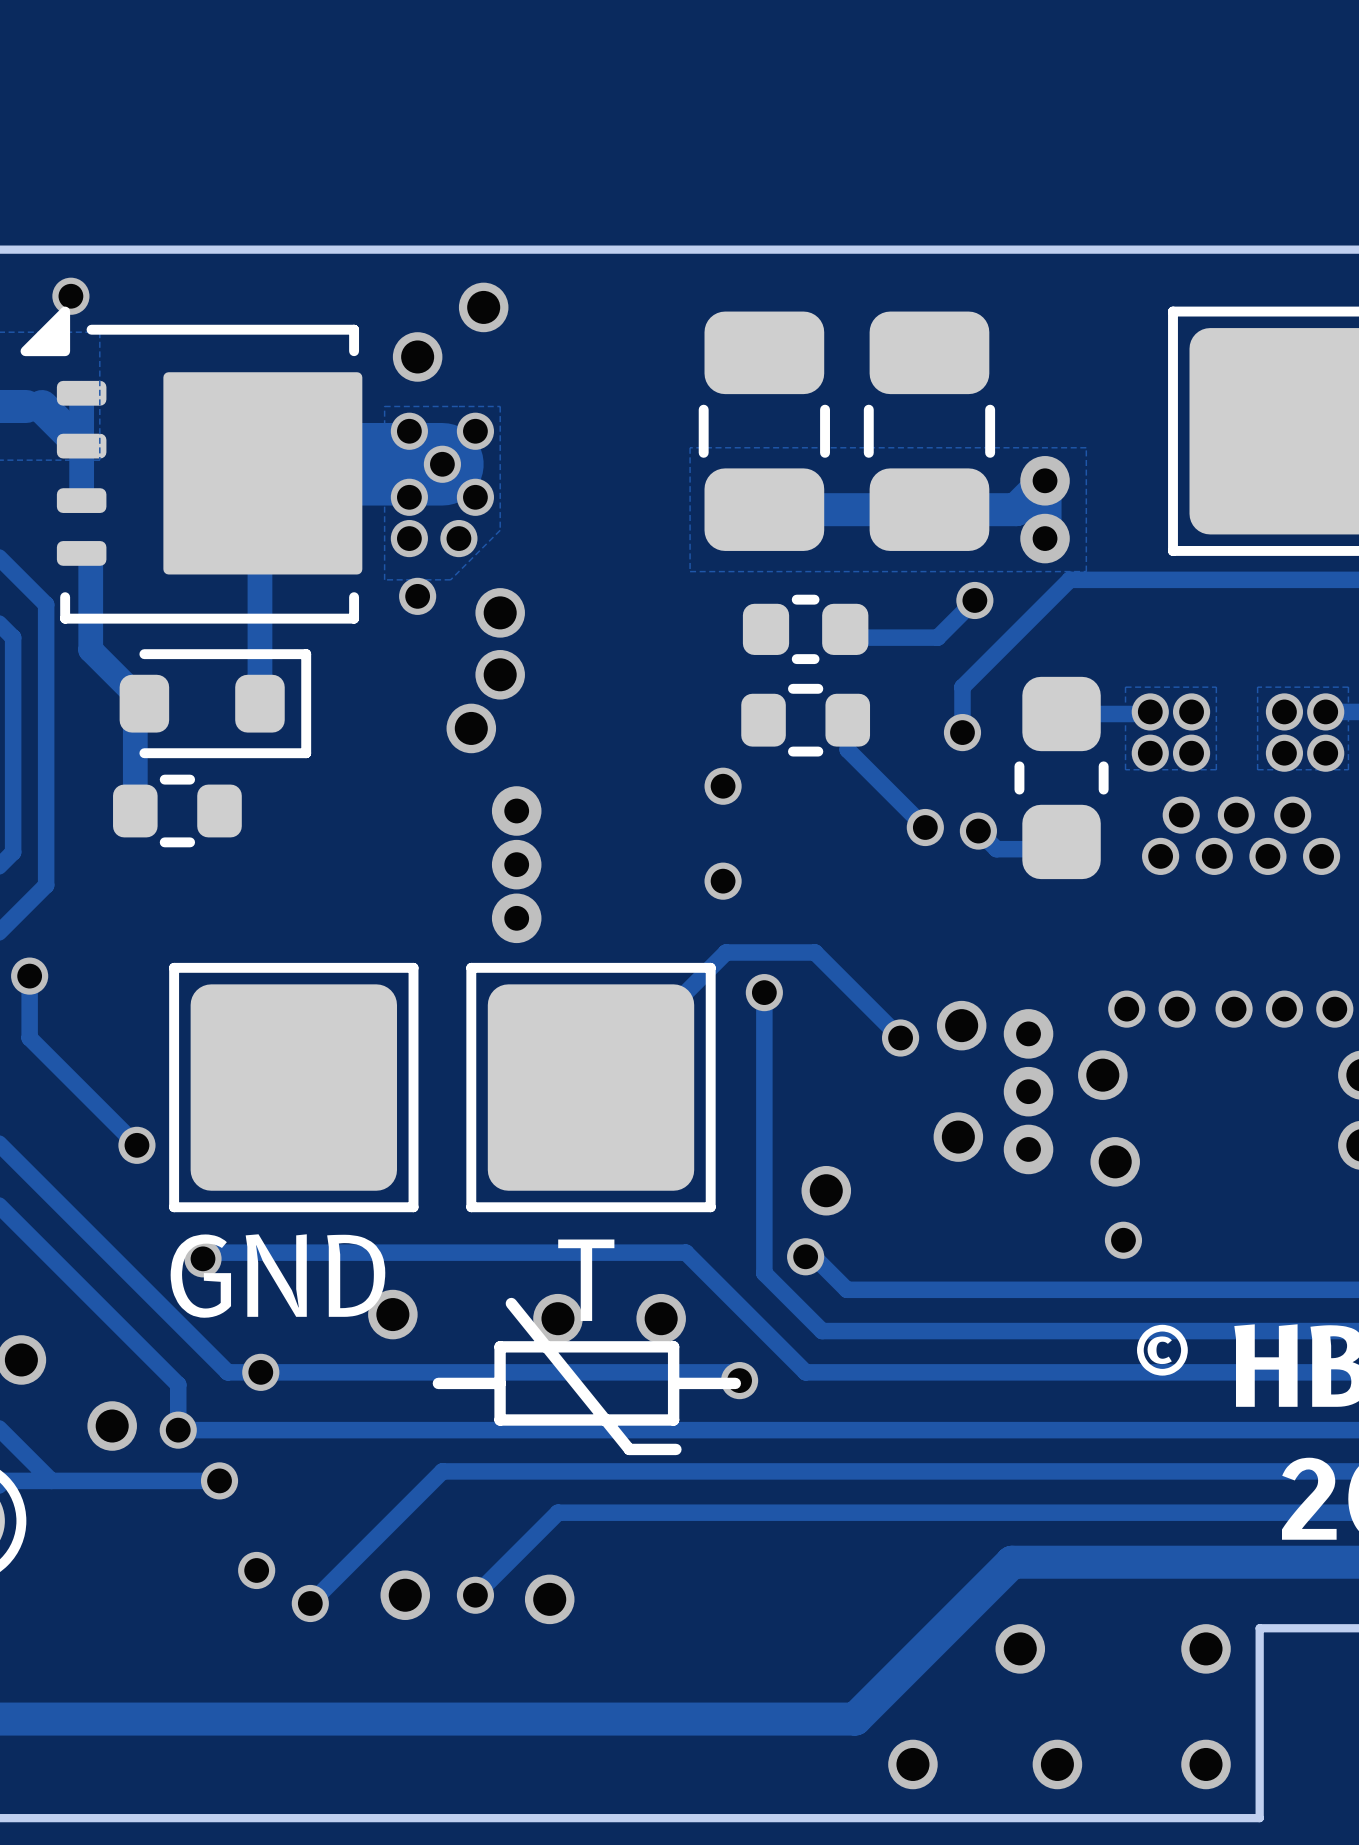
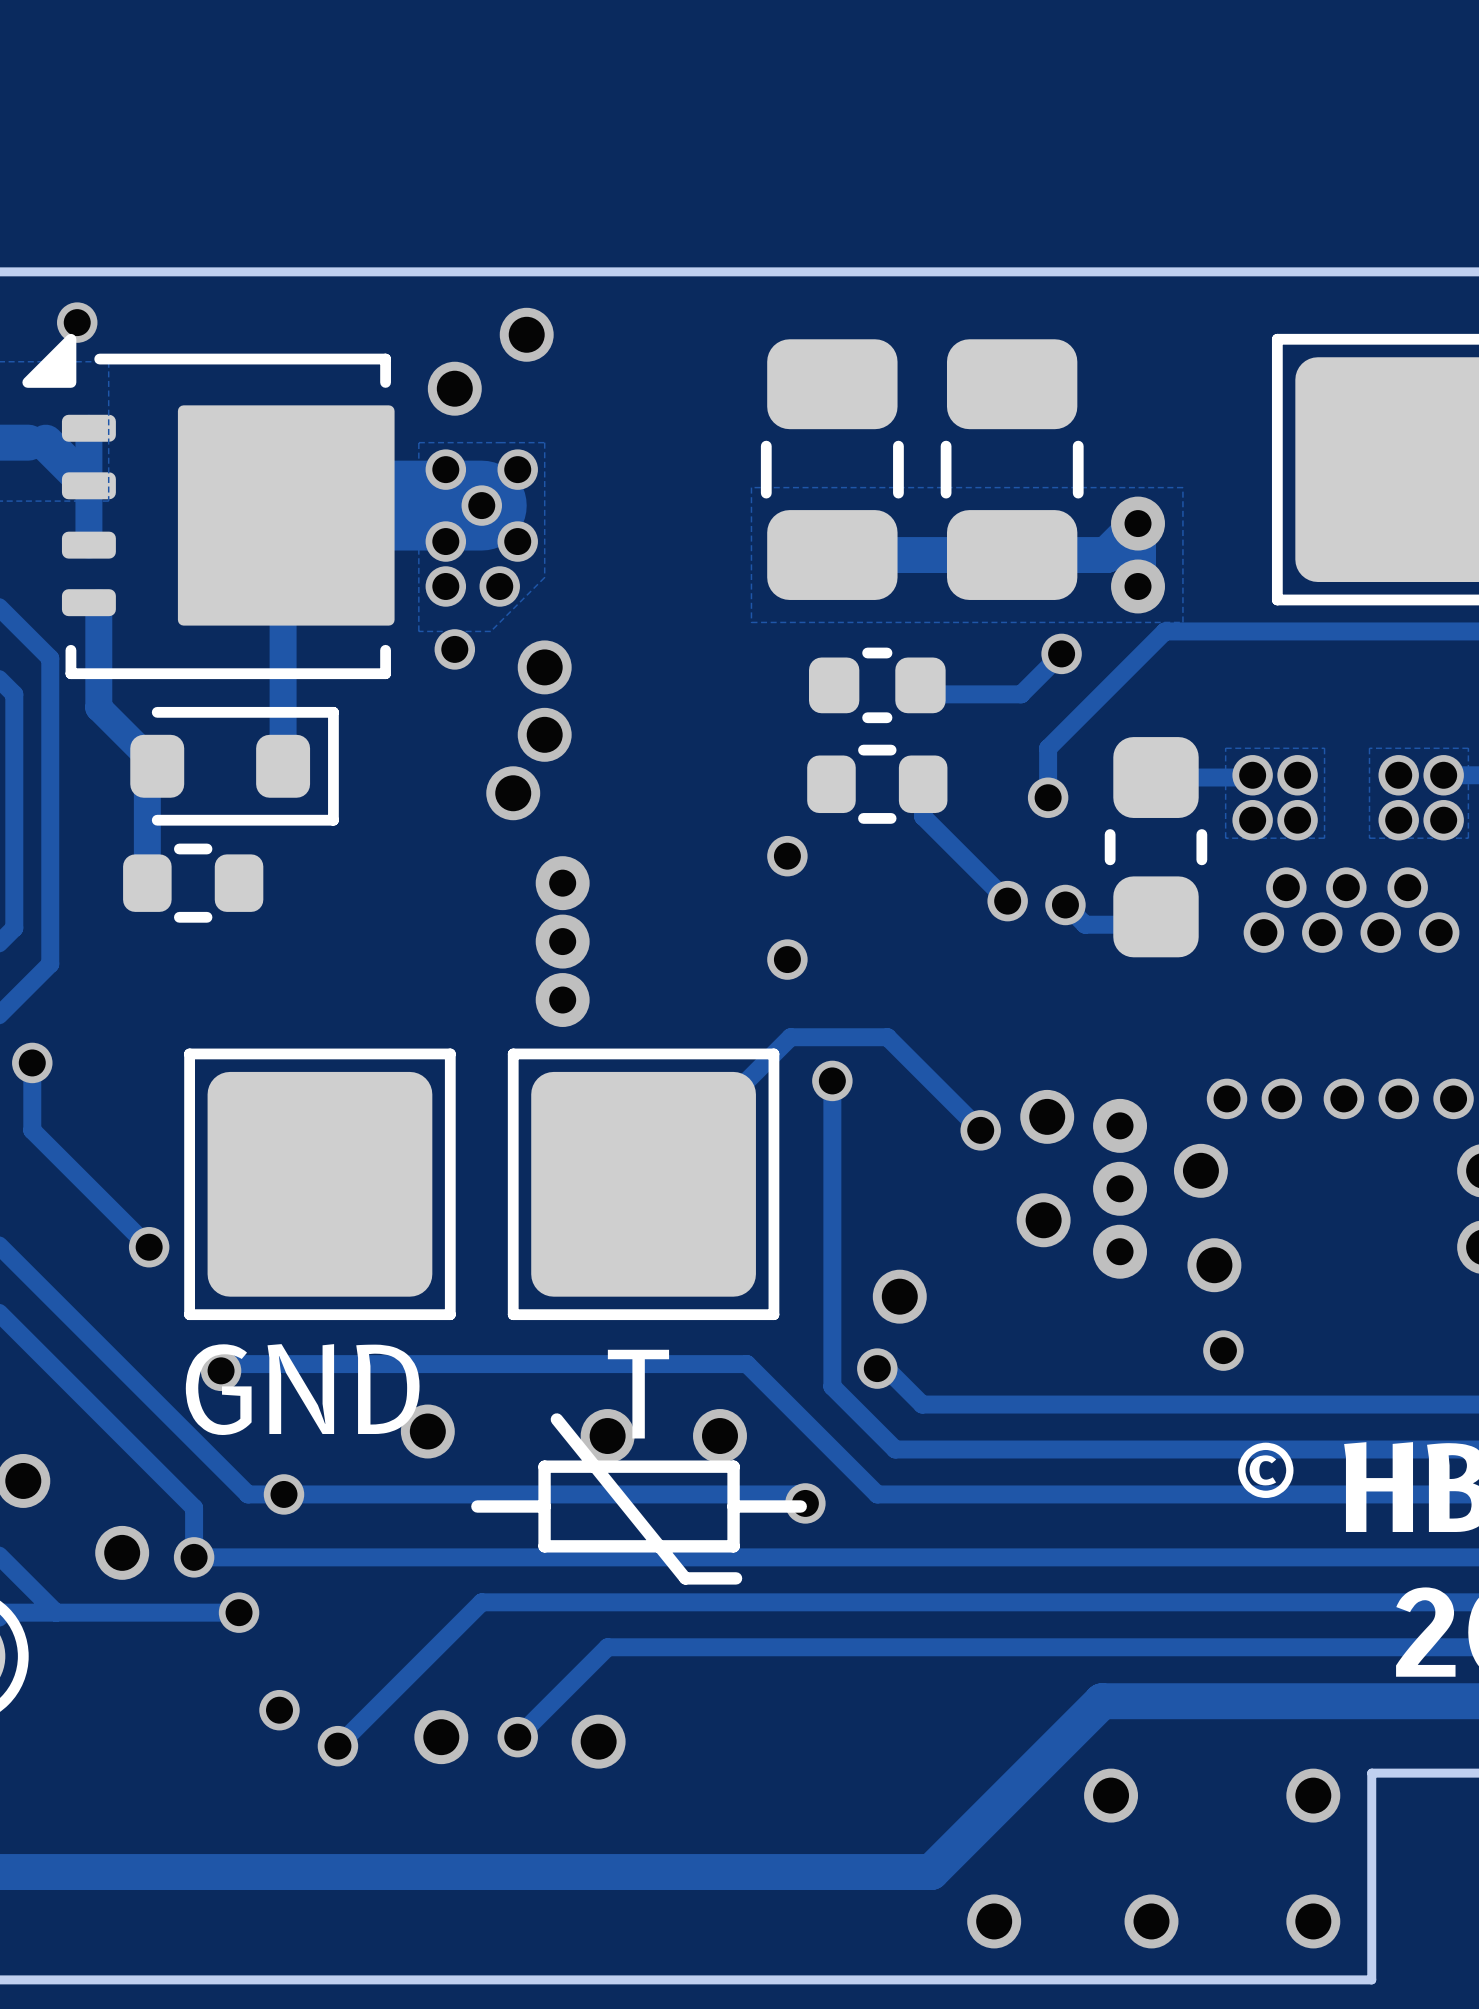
via position: (958, 1137) -> (1043, 1220)

